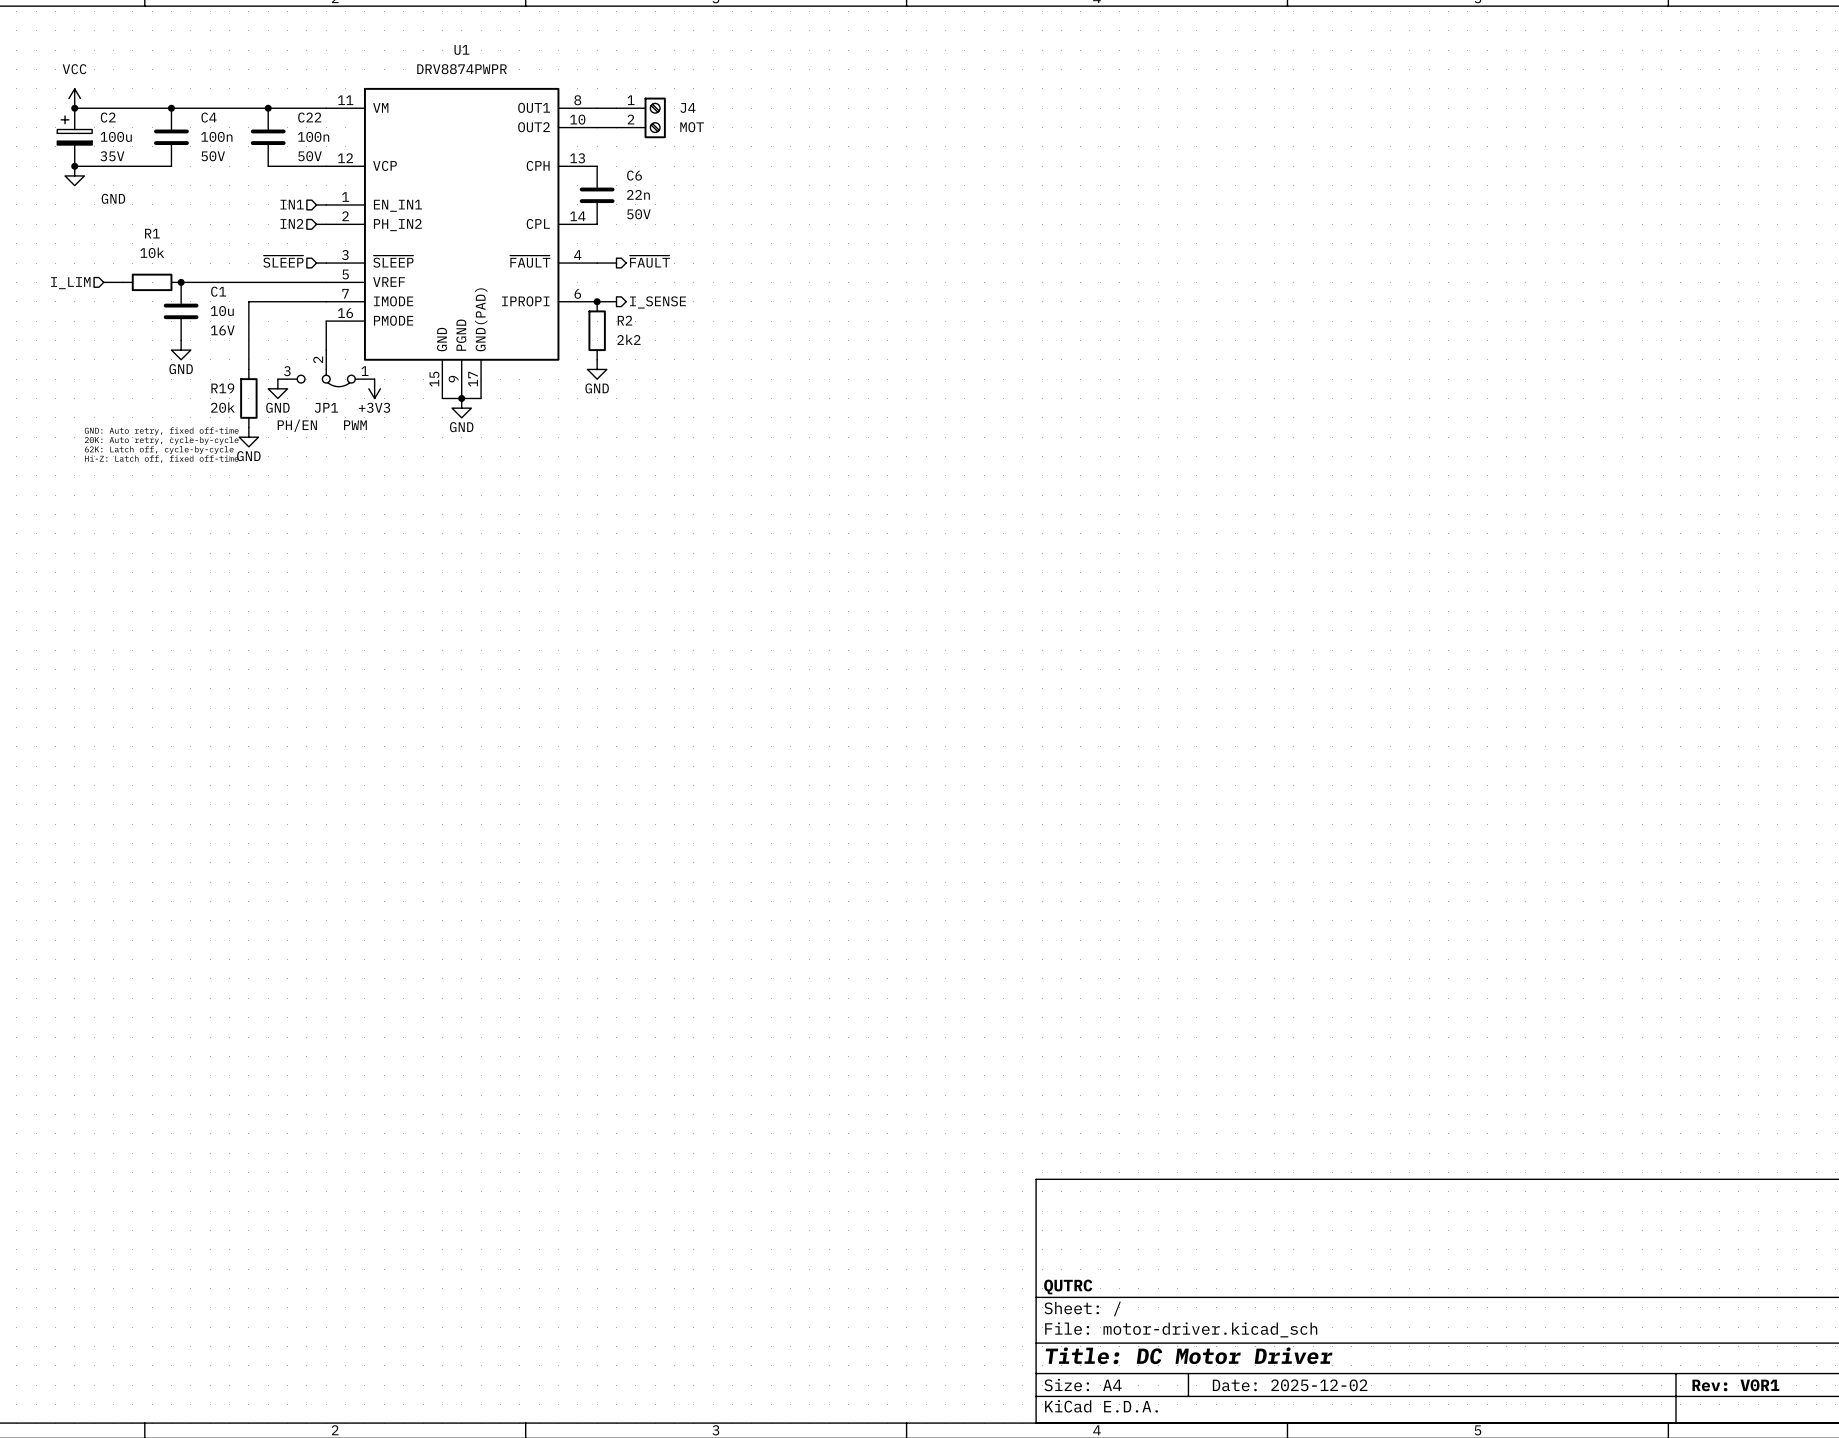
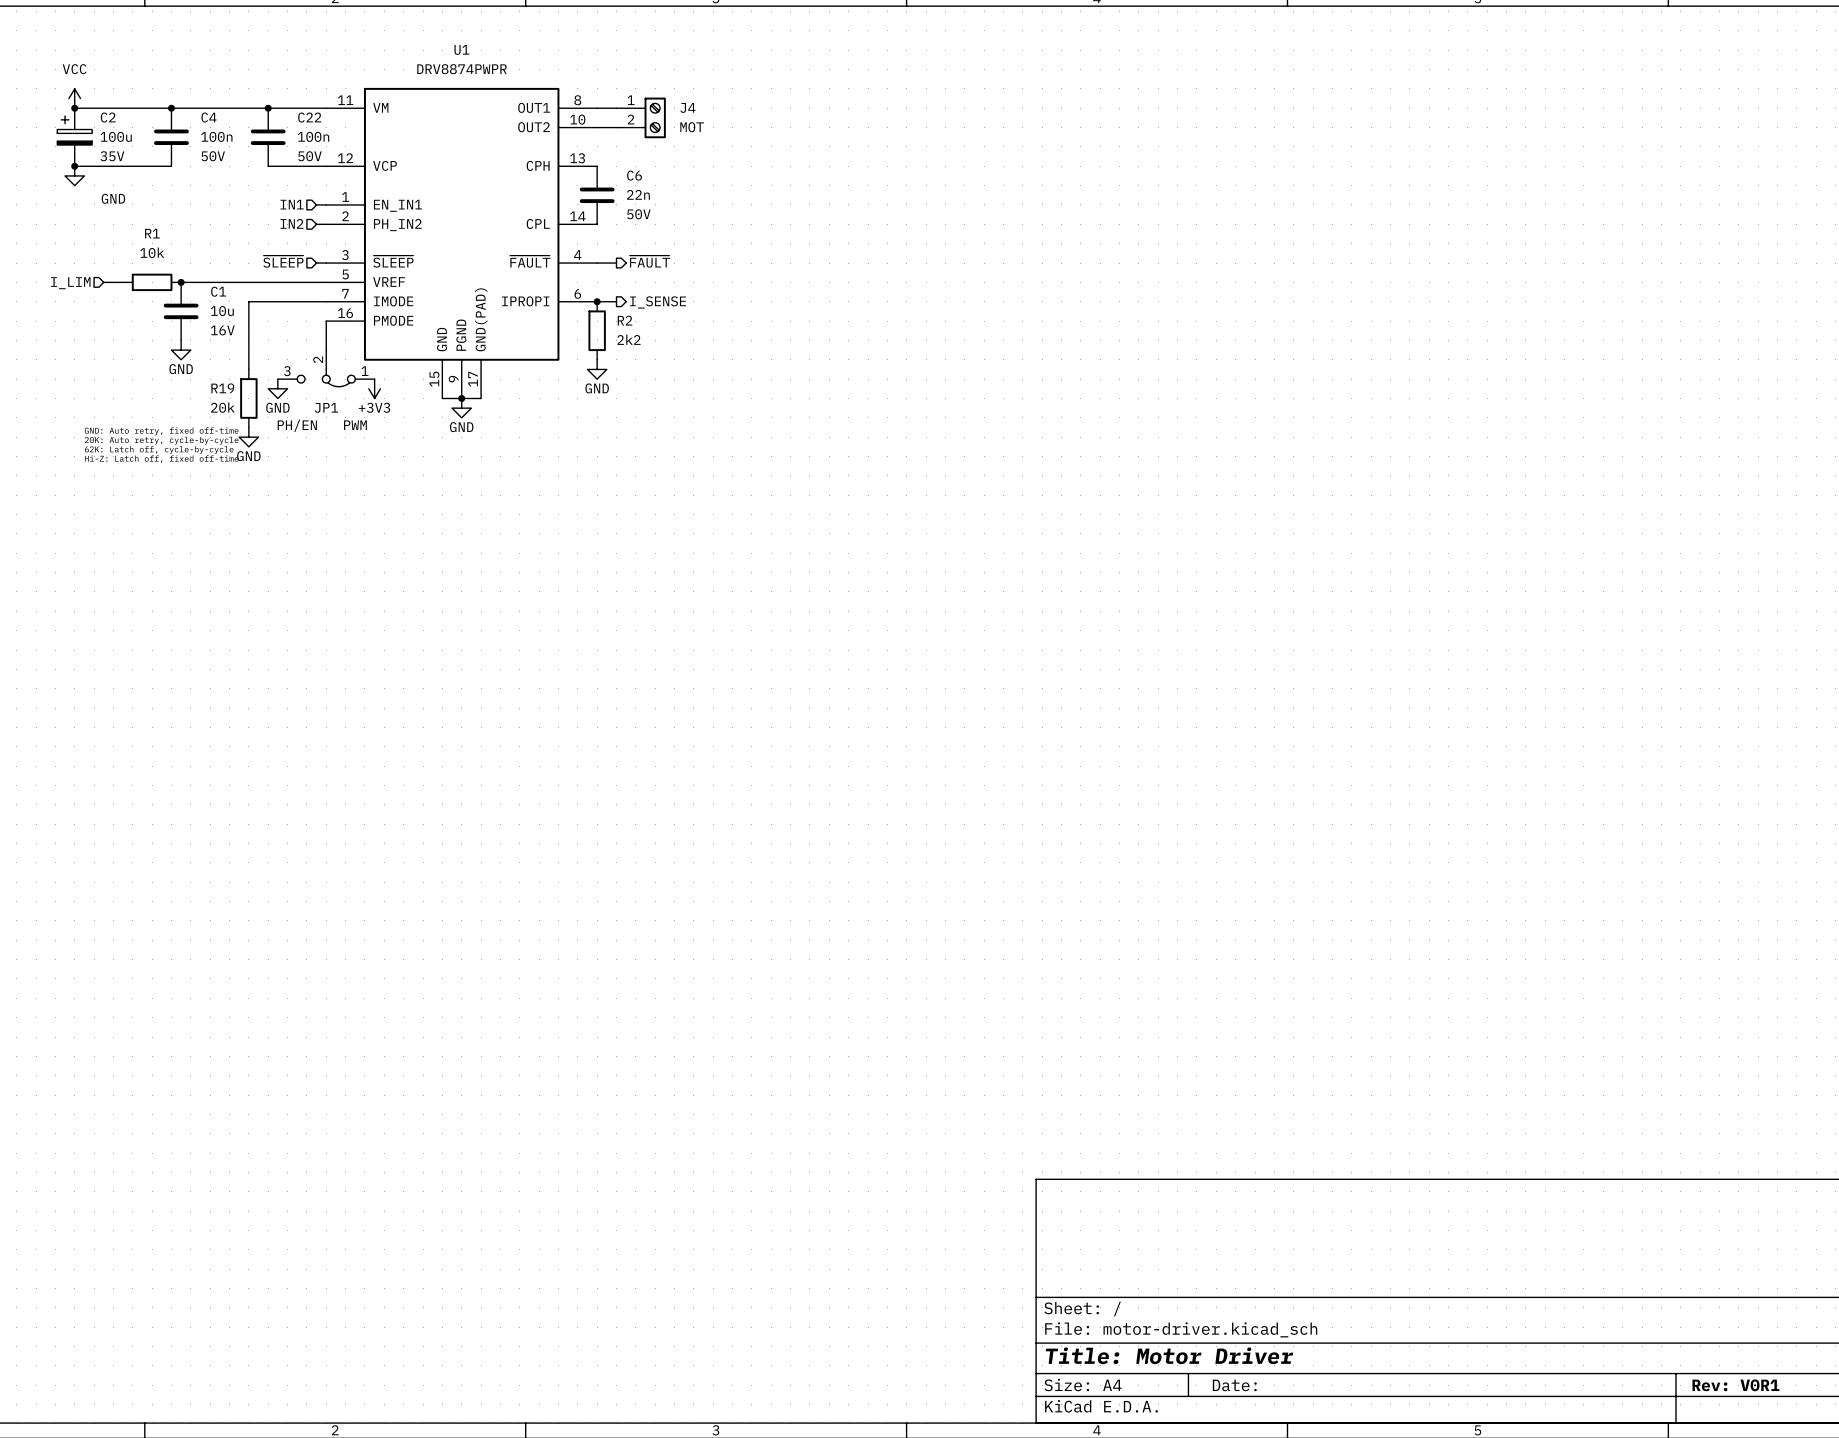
title block: QUTRC (1068, 1286) -> none
title block: Title: DC Motor Driver (1189, 1355) -> Title: Motor Driver (1169, 1355)
title block: Date: 2025-12-02 (1290, 1385) -> Date: (1234, 1385)

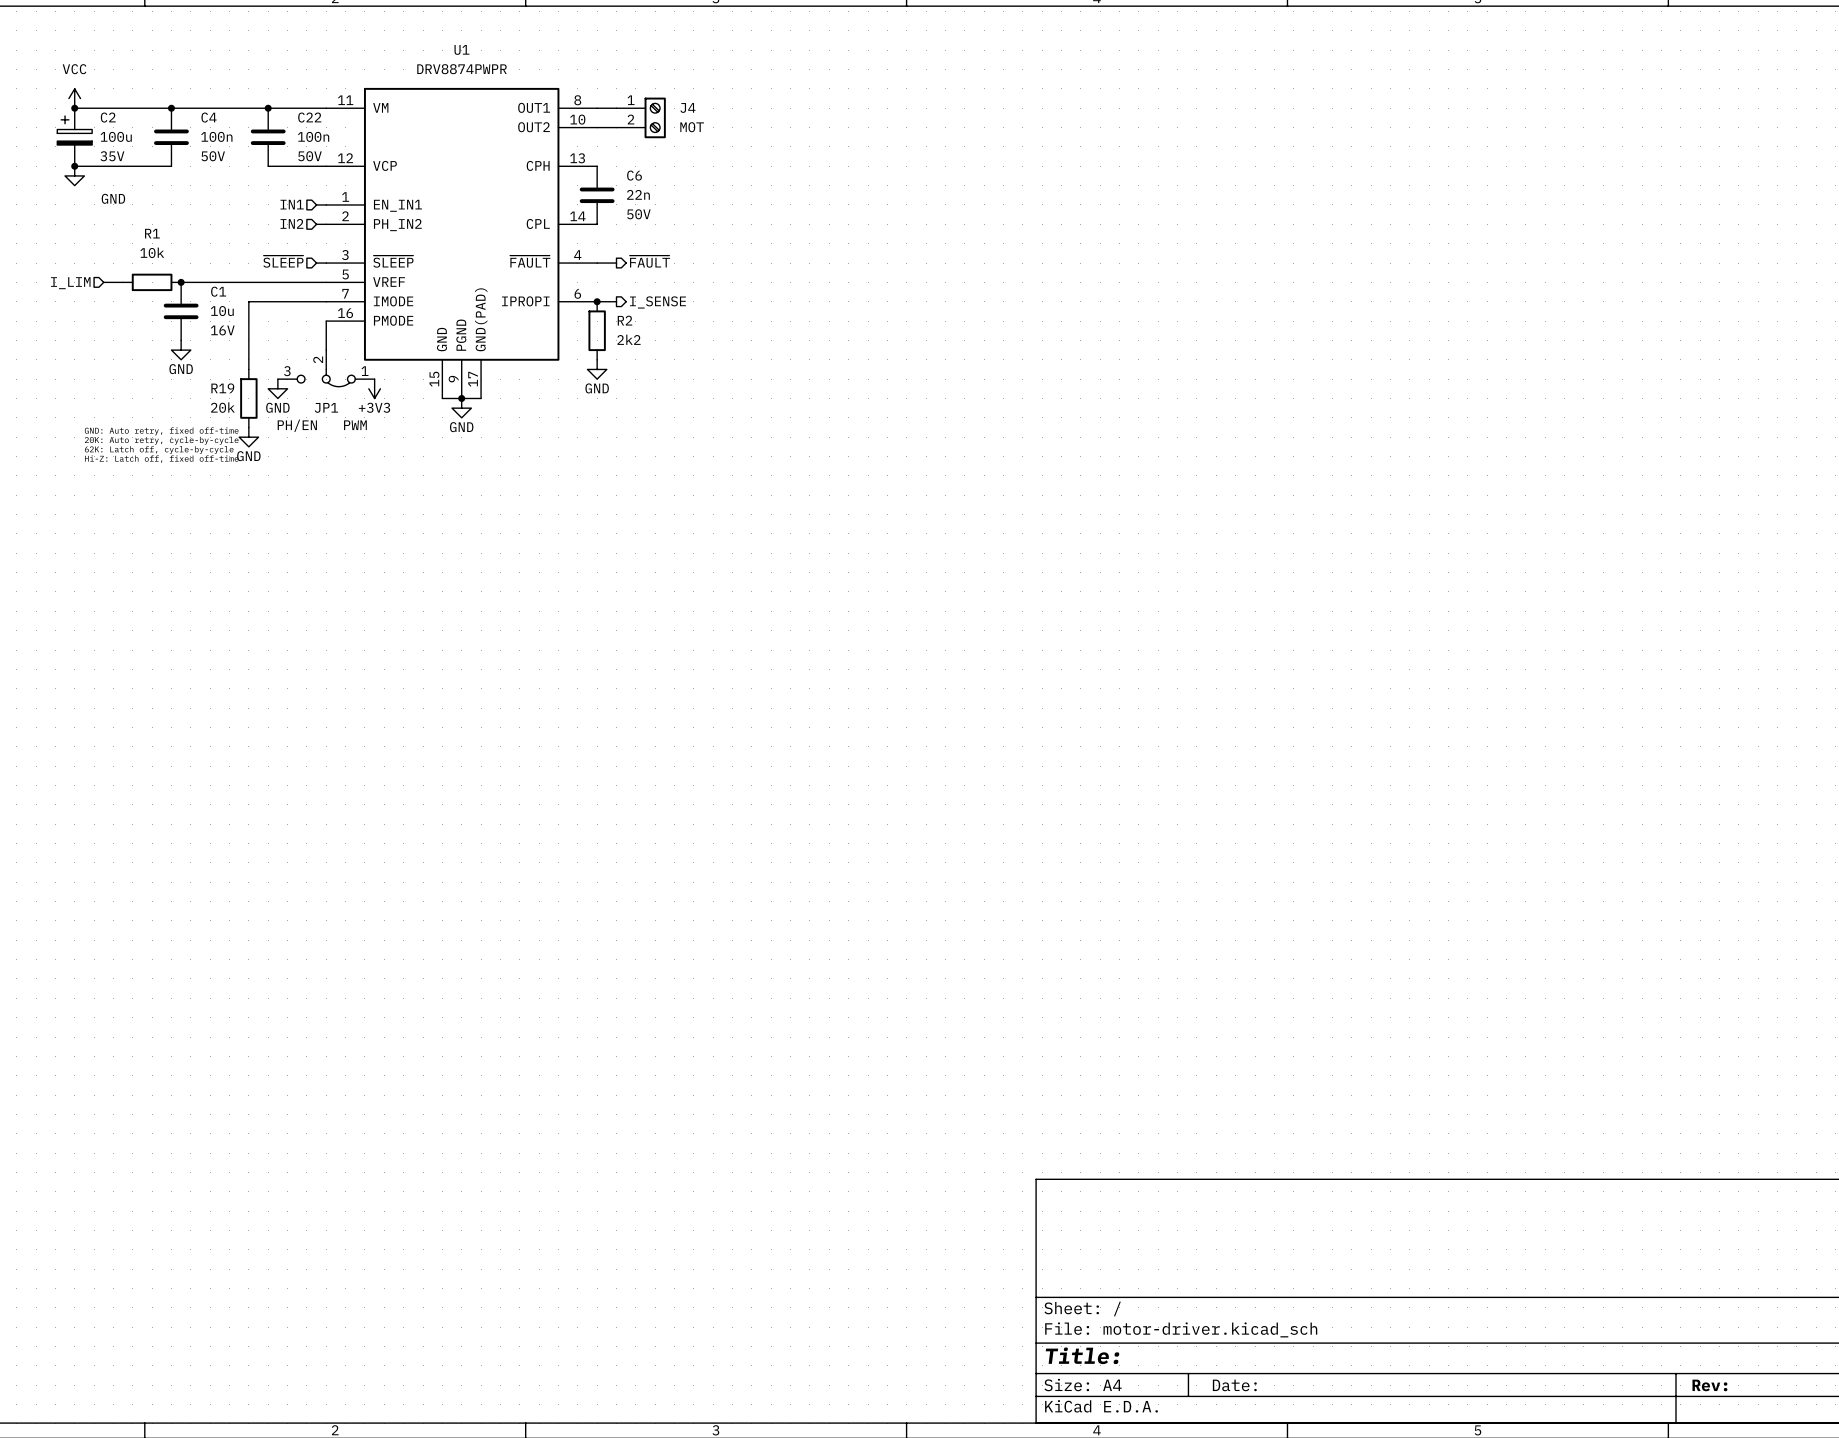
title block: Title: Motor Driver (1169, 1355) -> Title: (1082, 1355)
title block: Rev: V0R1 (1735, 1385) -> Rev: (1709, 1385)

